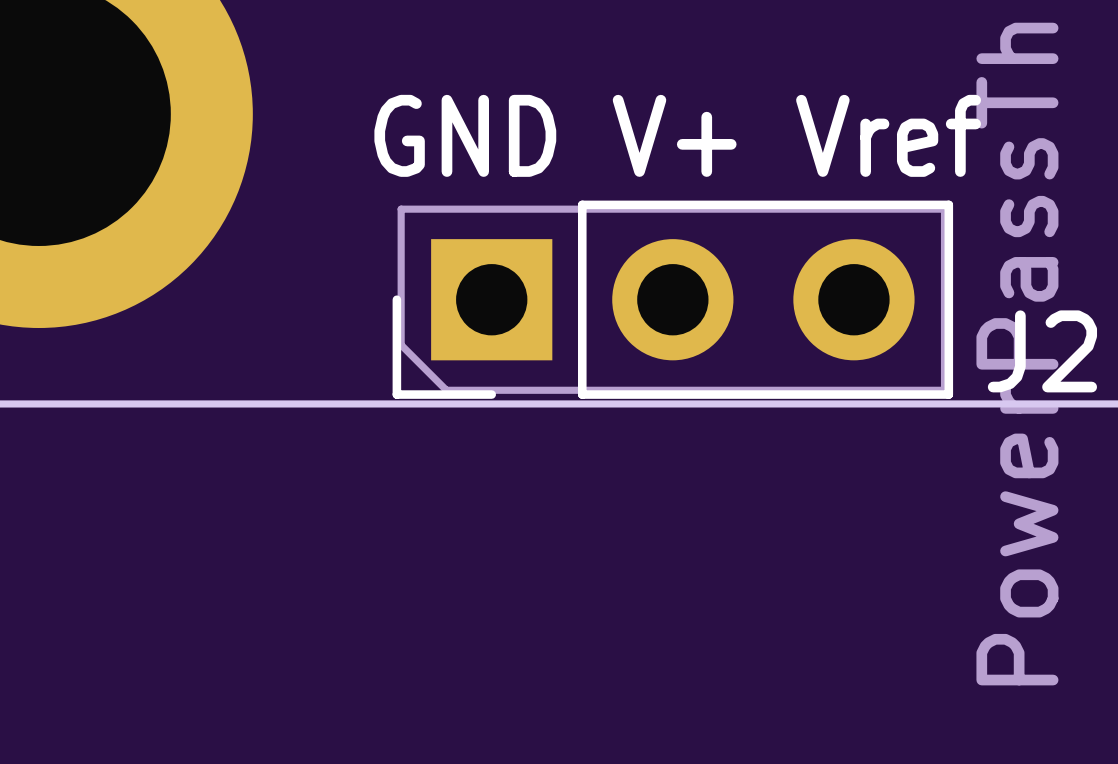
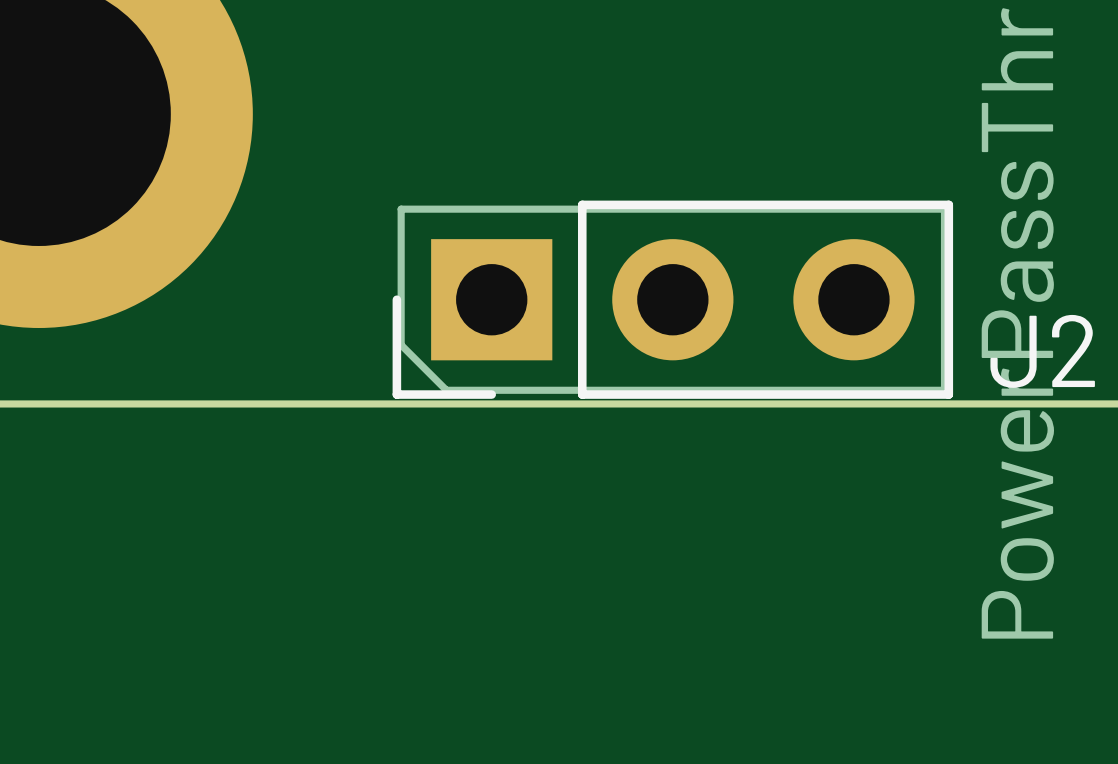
text: GND V+ Vref (677, 135) -> none

